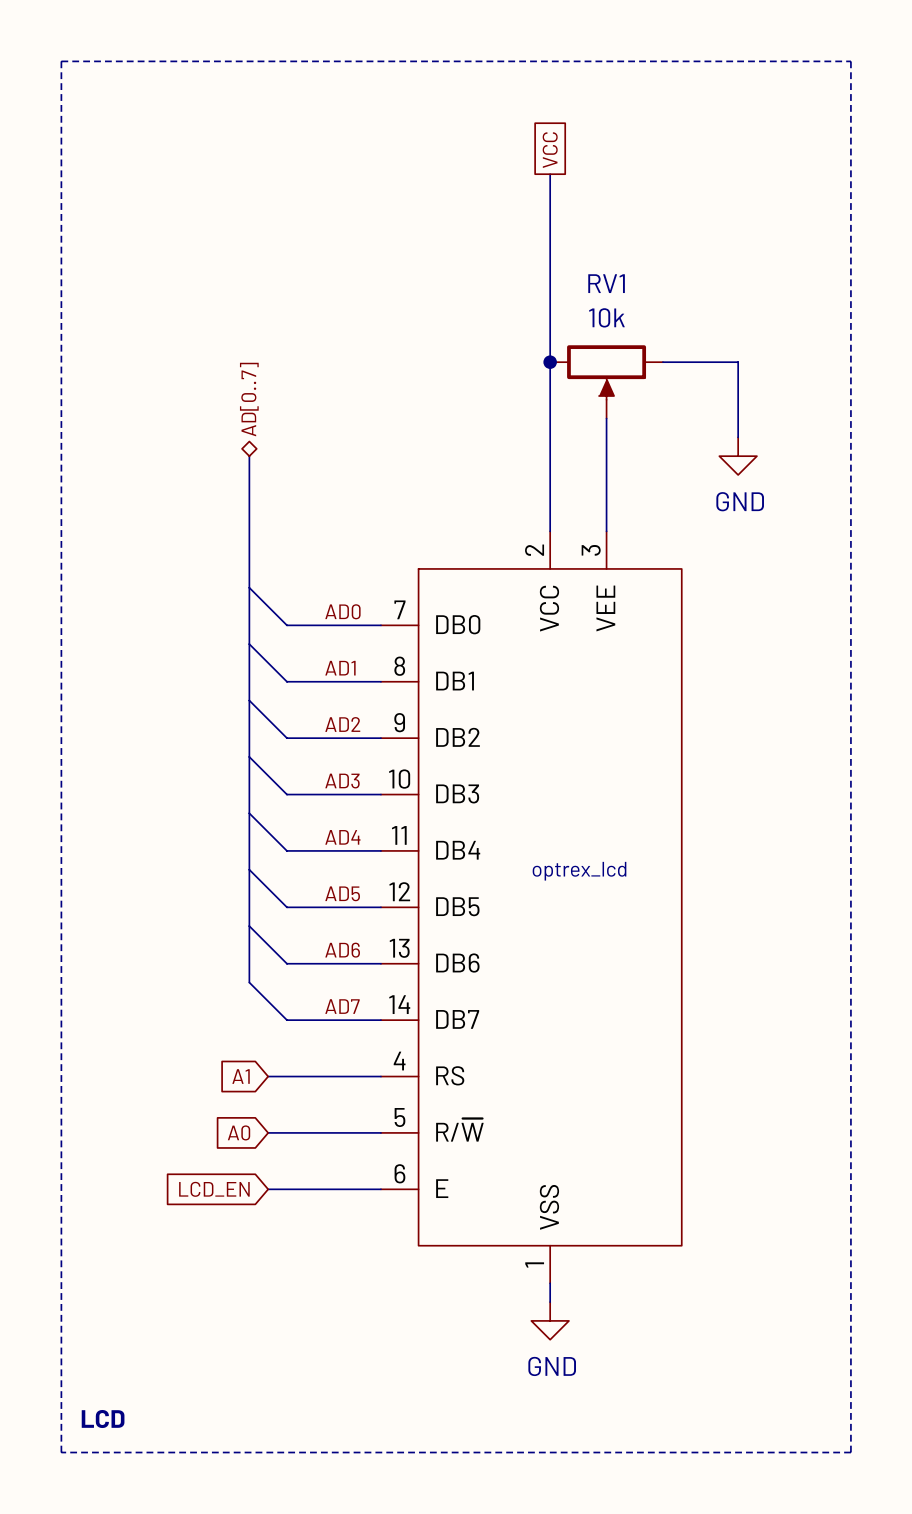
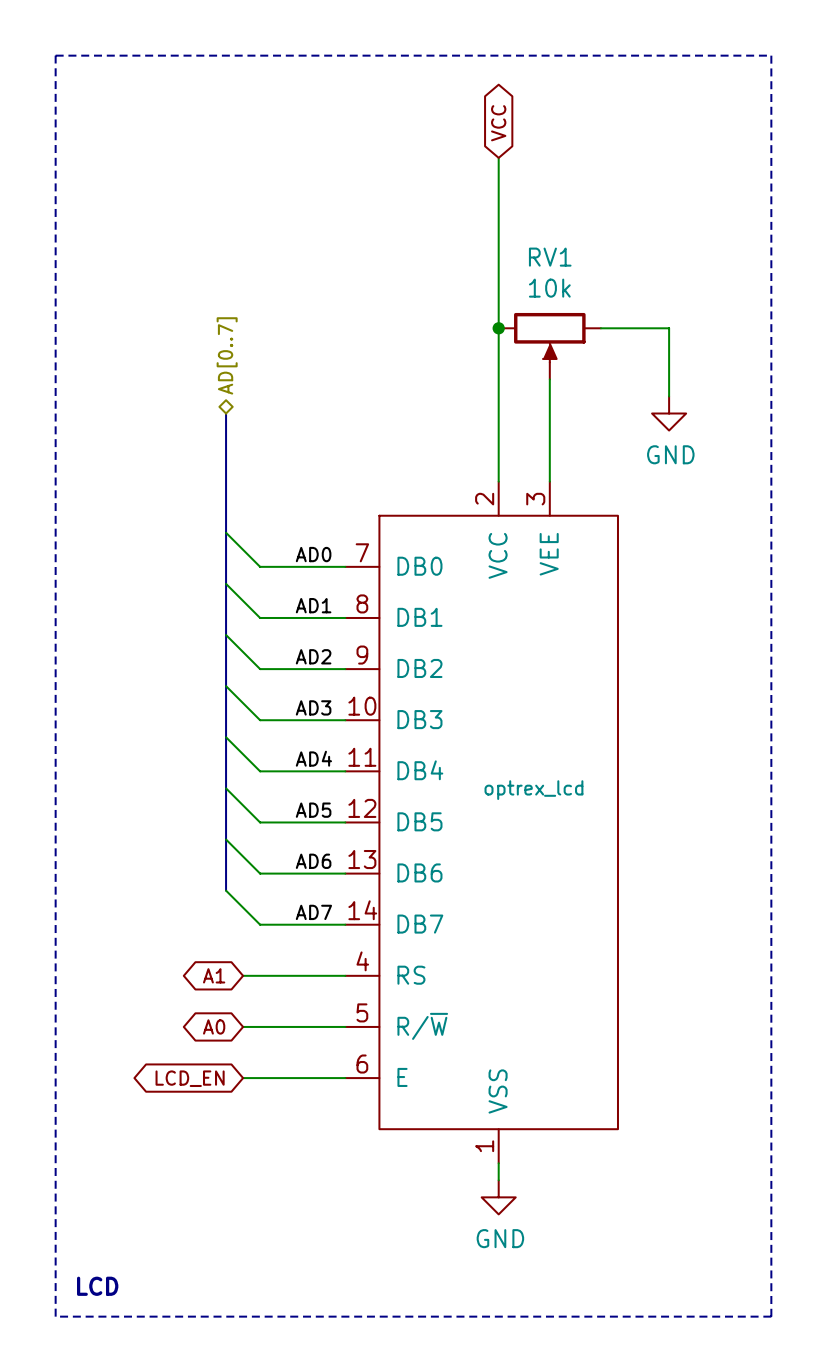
global label shape: passive (550, 150) -> bidirectional (498, 123)
global label shape: input (241, 1076) -> bidirectional (214, 975)
global label shape: input (239, 1132) -> bidirectional (214, 1026)
global label shape: input (214, 1189) -> bidirectional (190, 1078)

